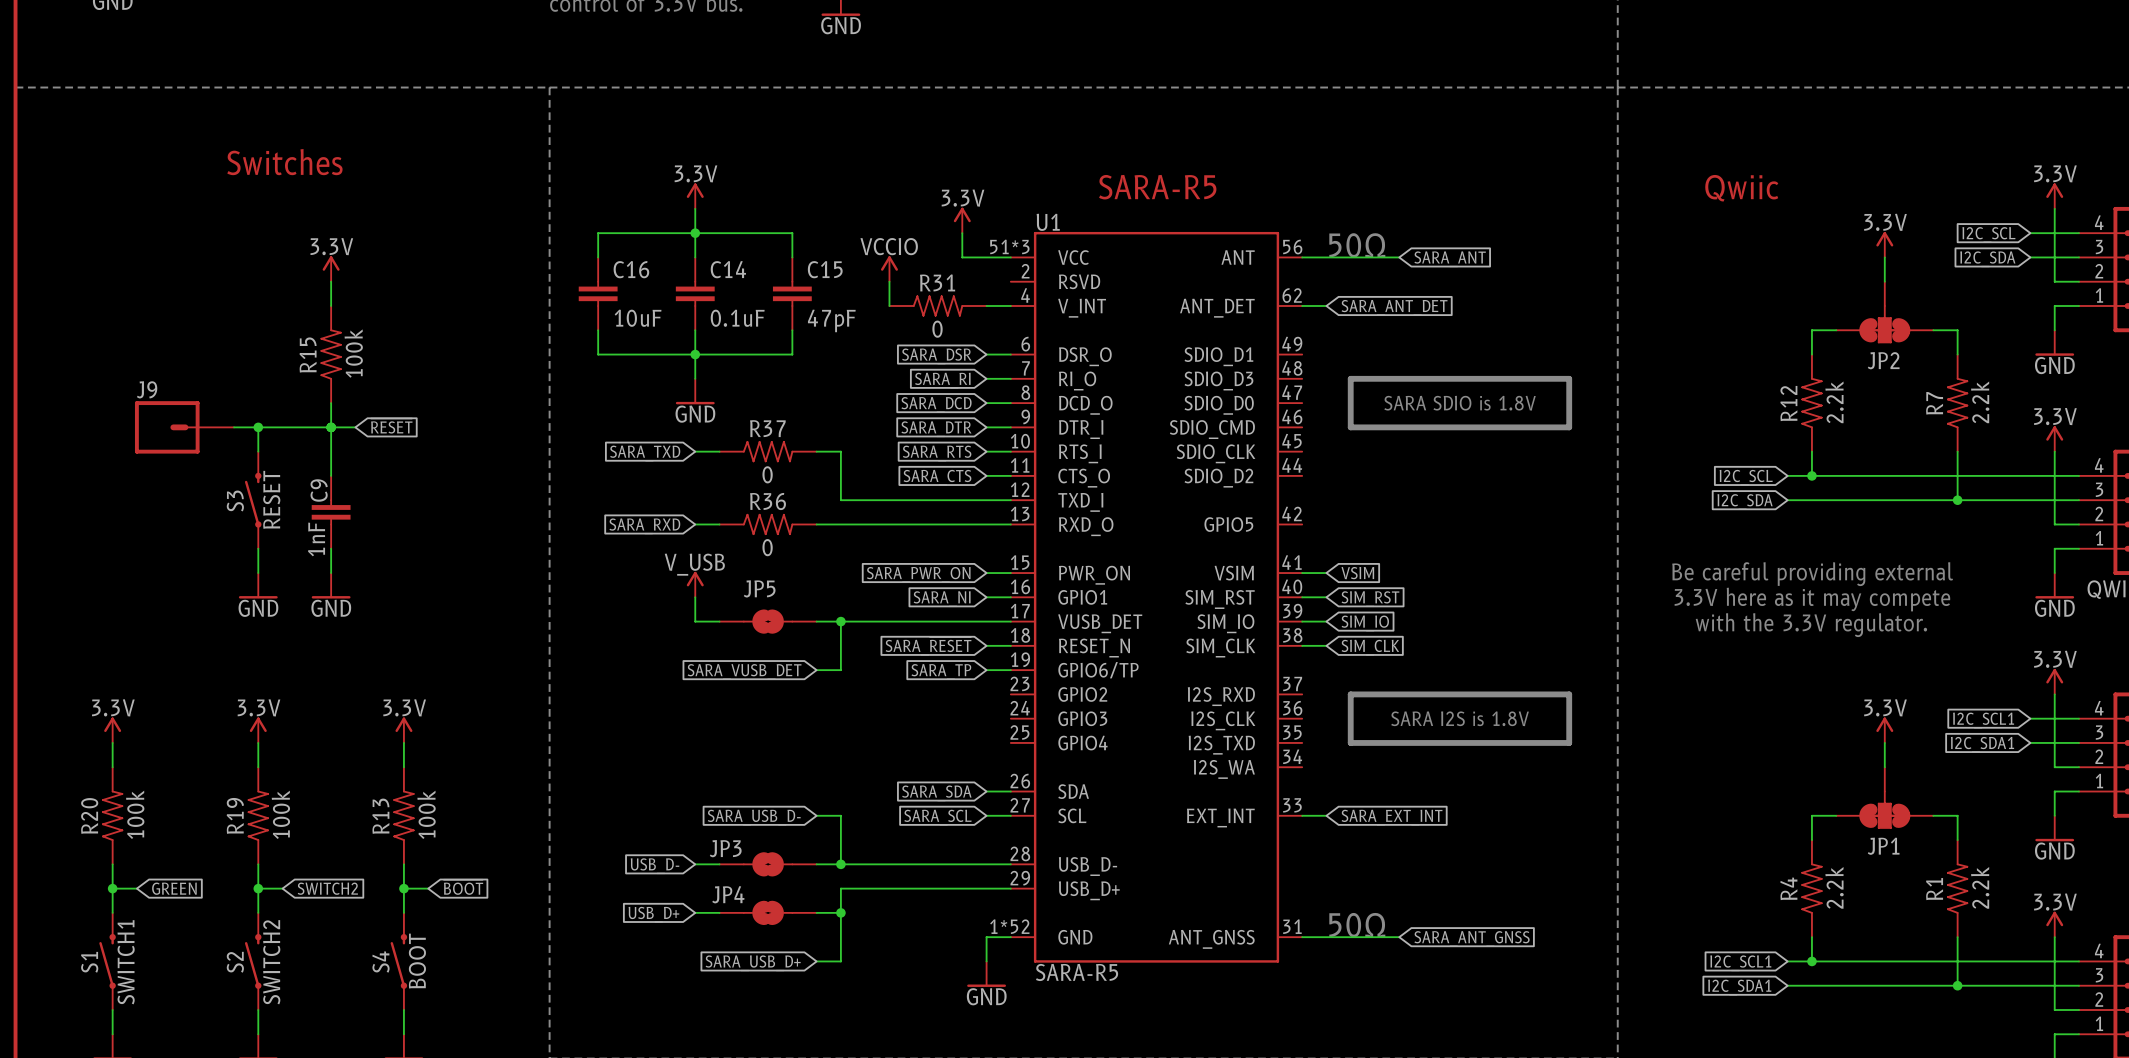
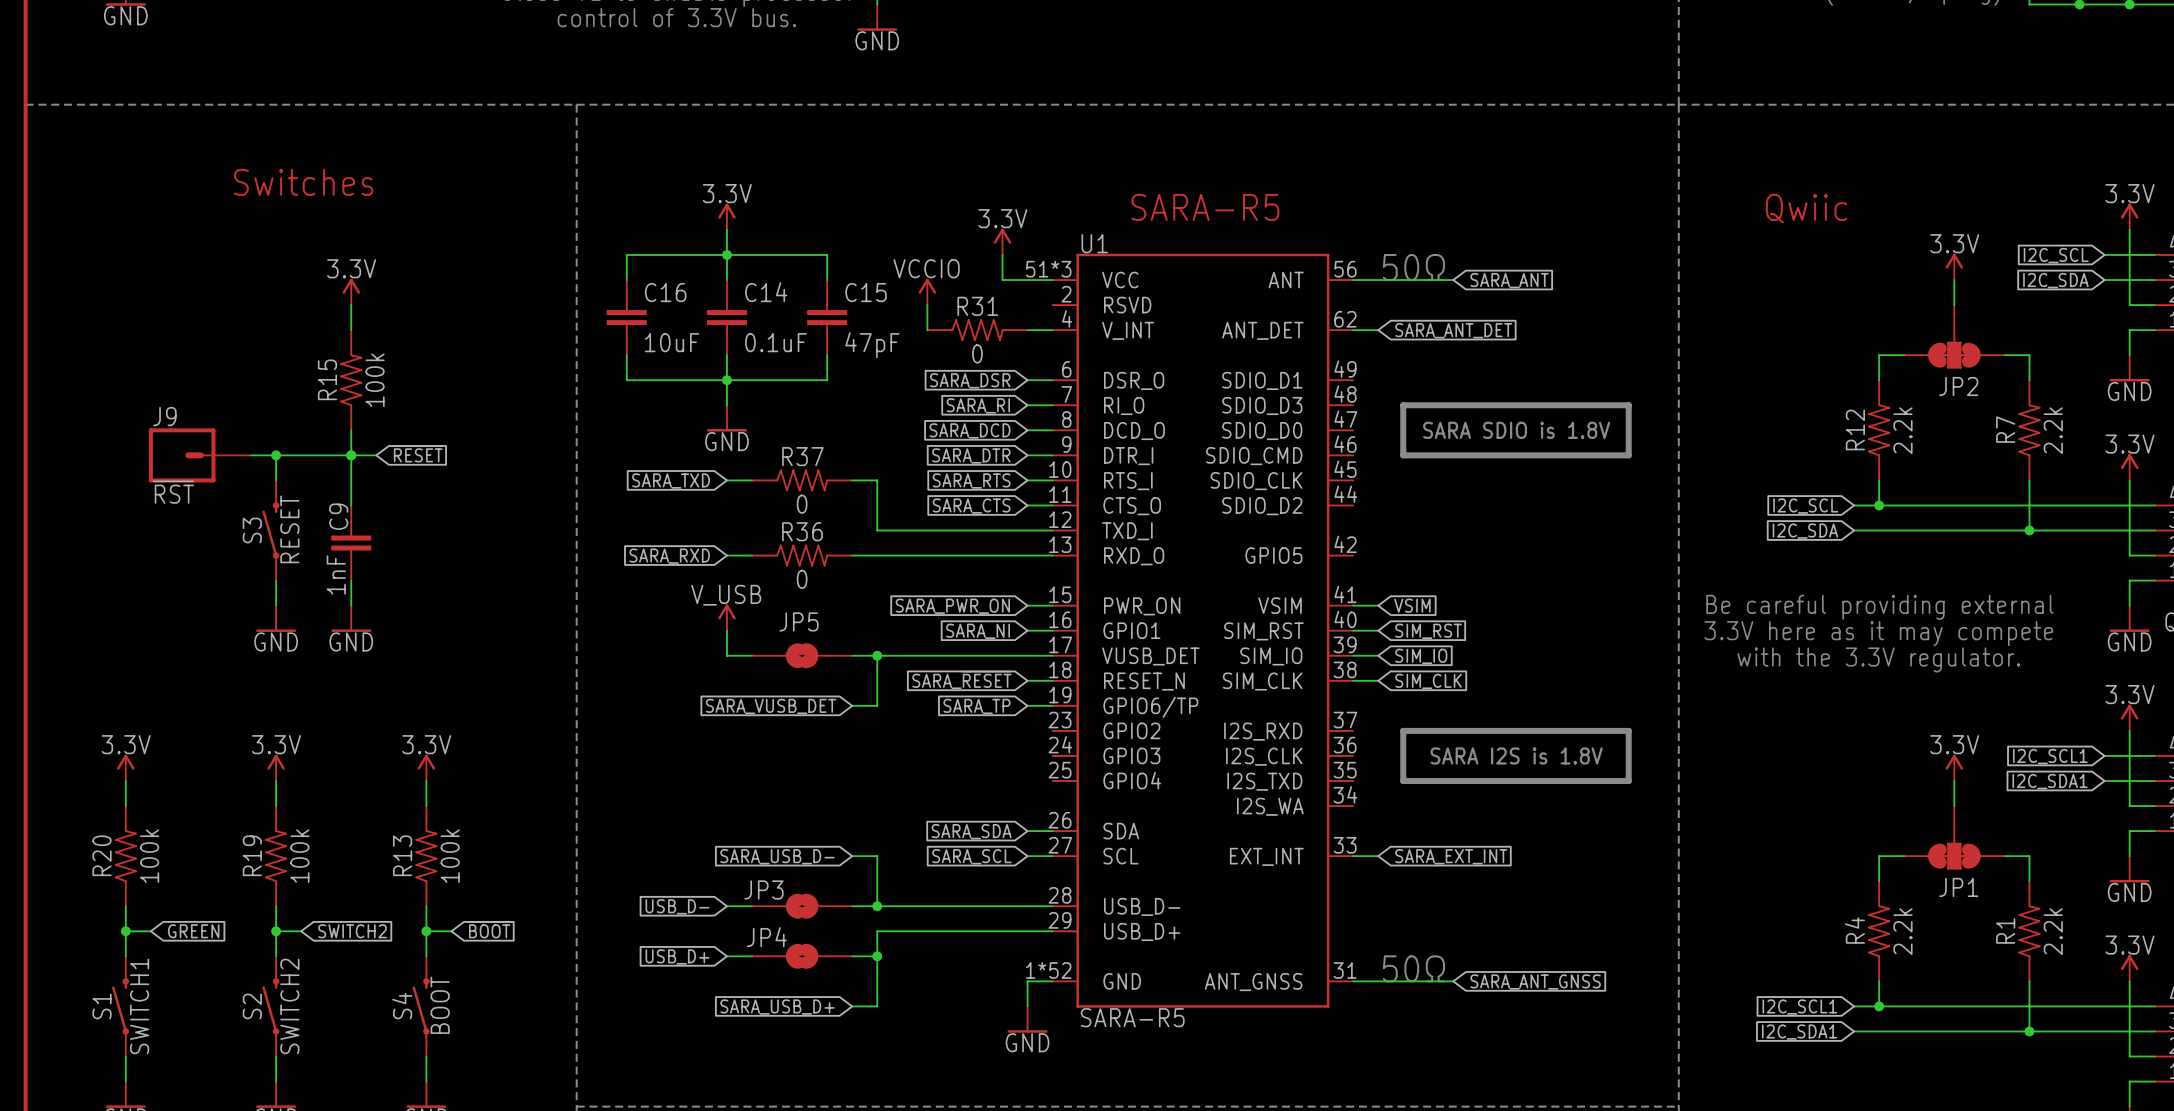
J9 value: none -> ~{RST} (173, 492)

